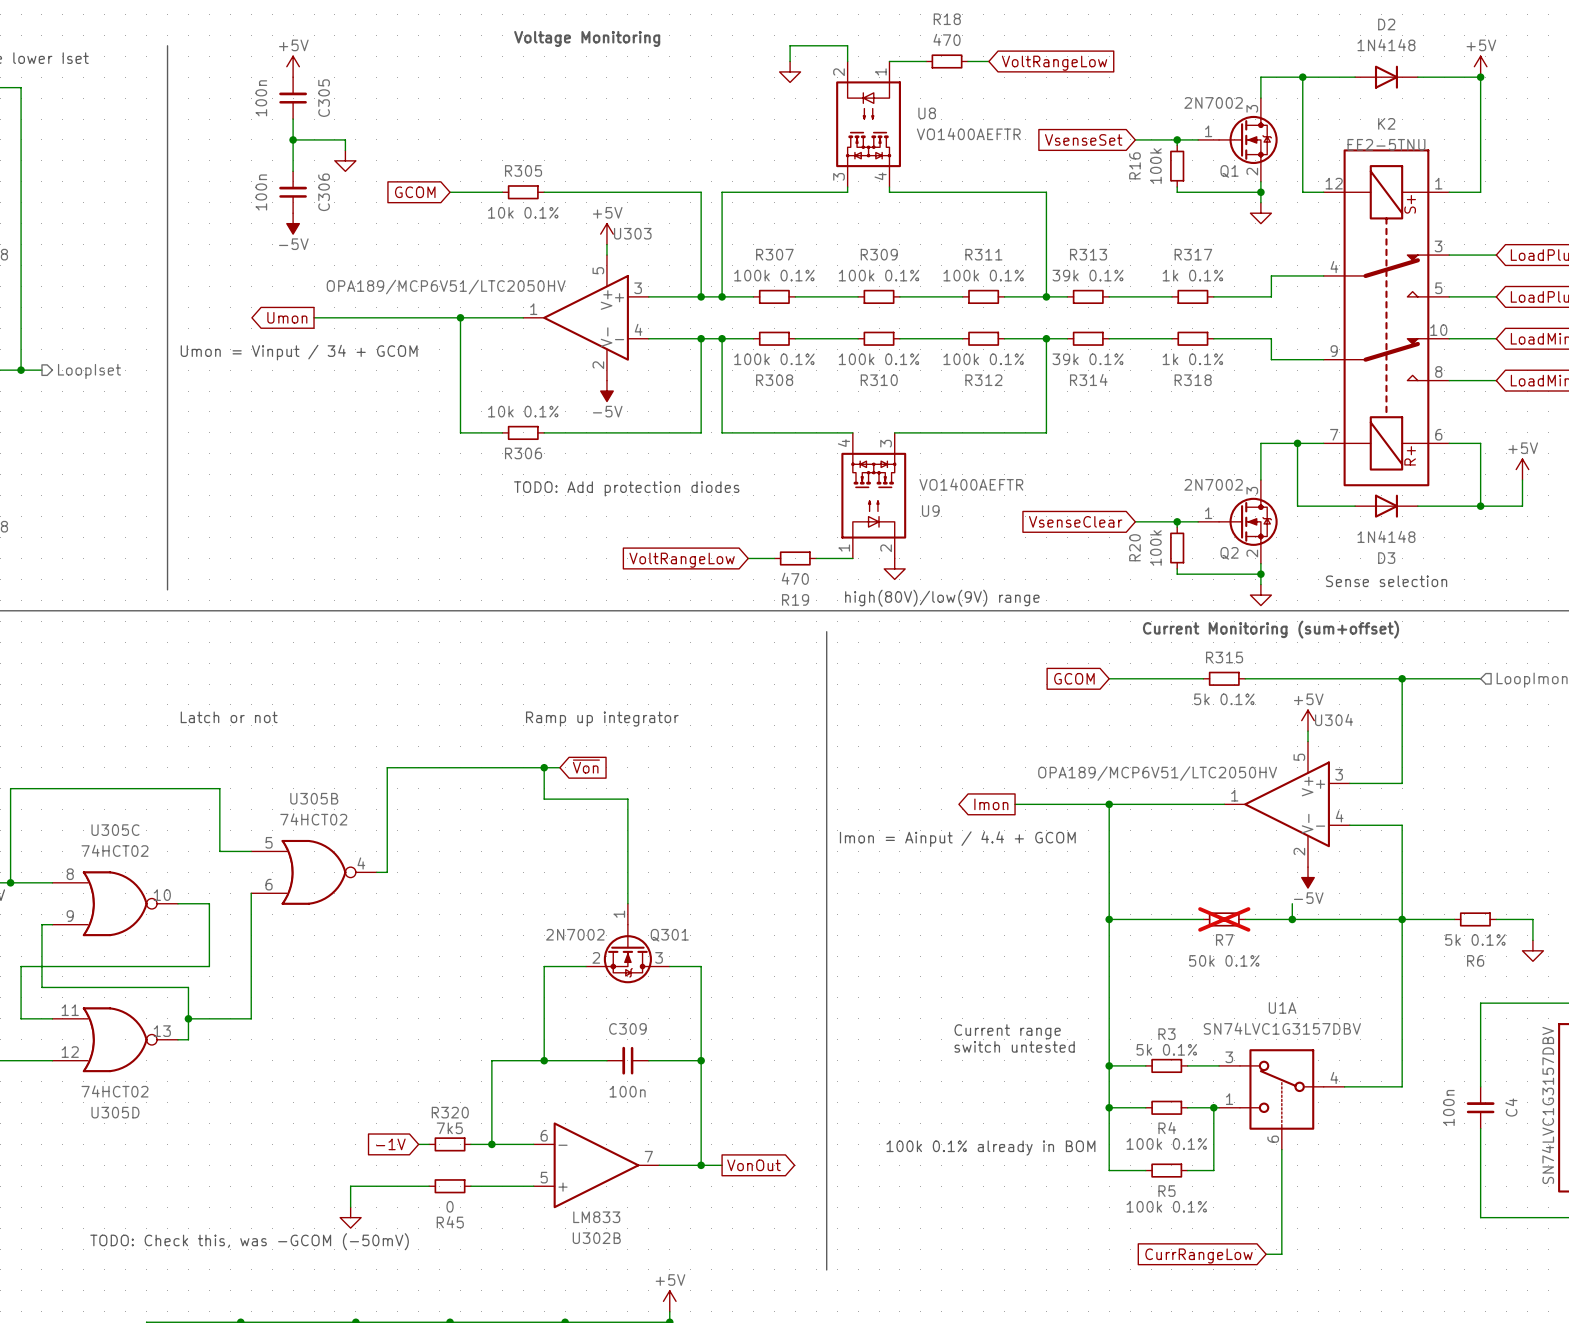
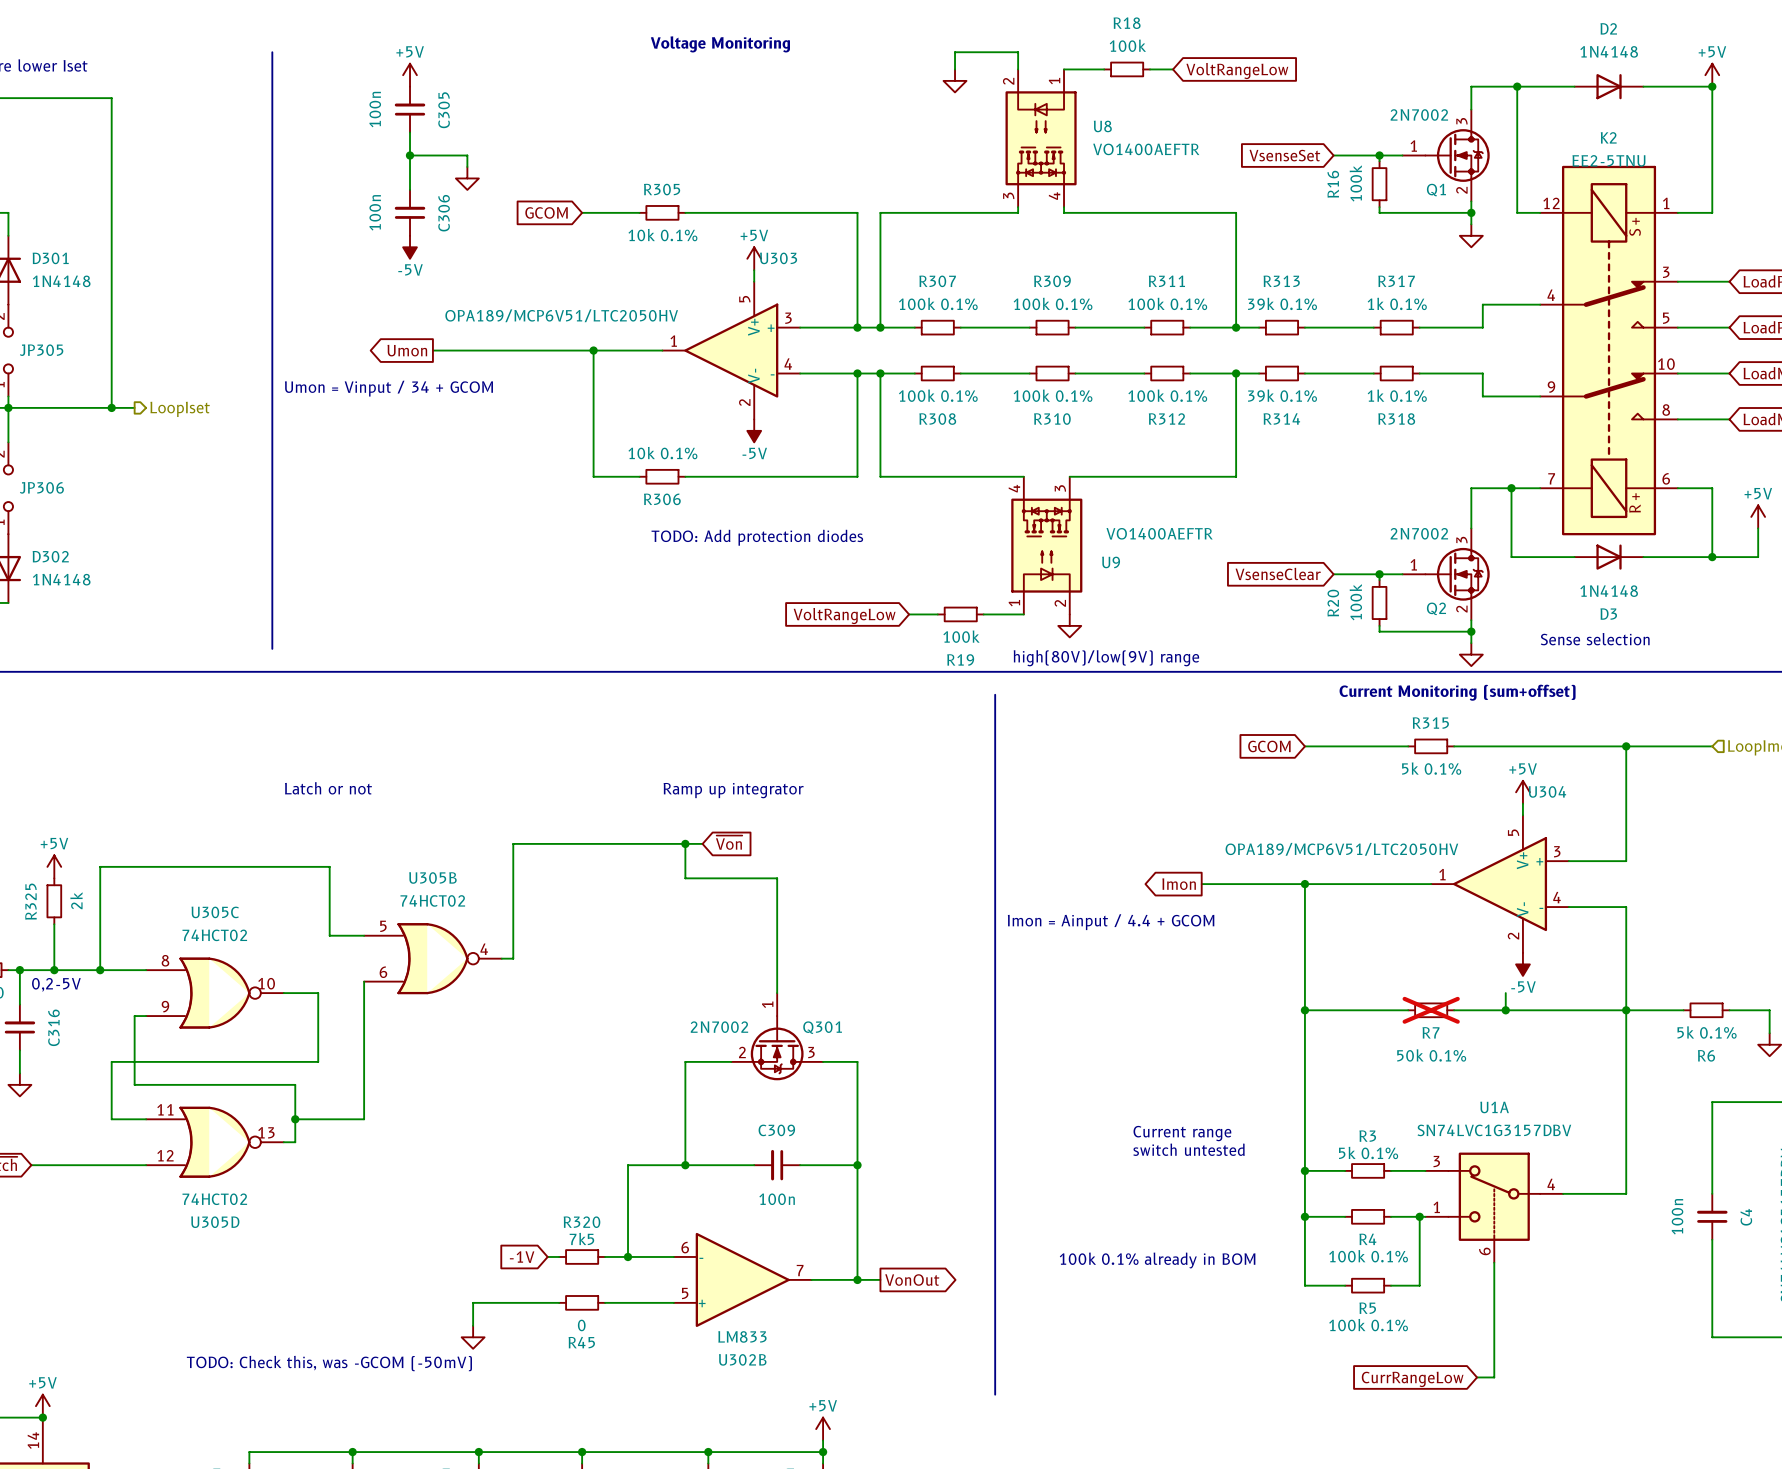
R18 value: 470 (947, 39) -> 100k (1127, 45)
R19 value: 470 (795, 578) -> 100k (961, 636)

